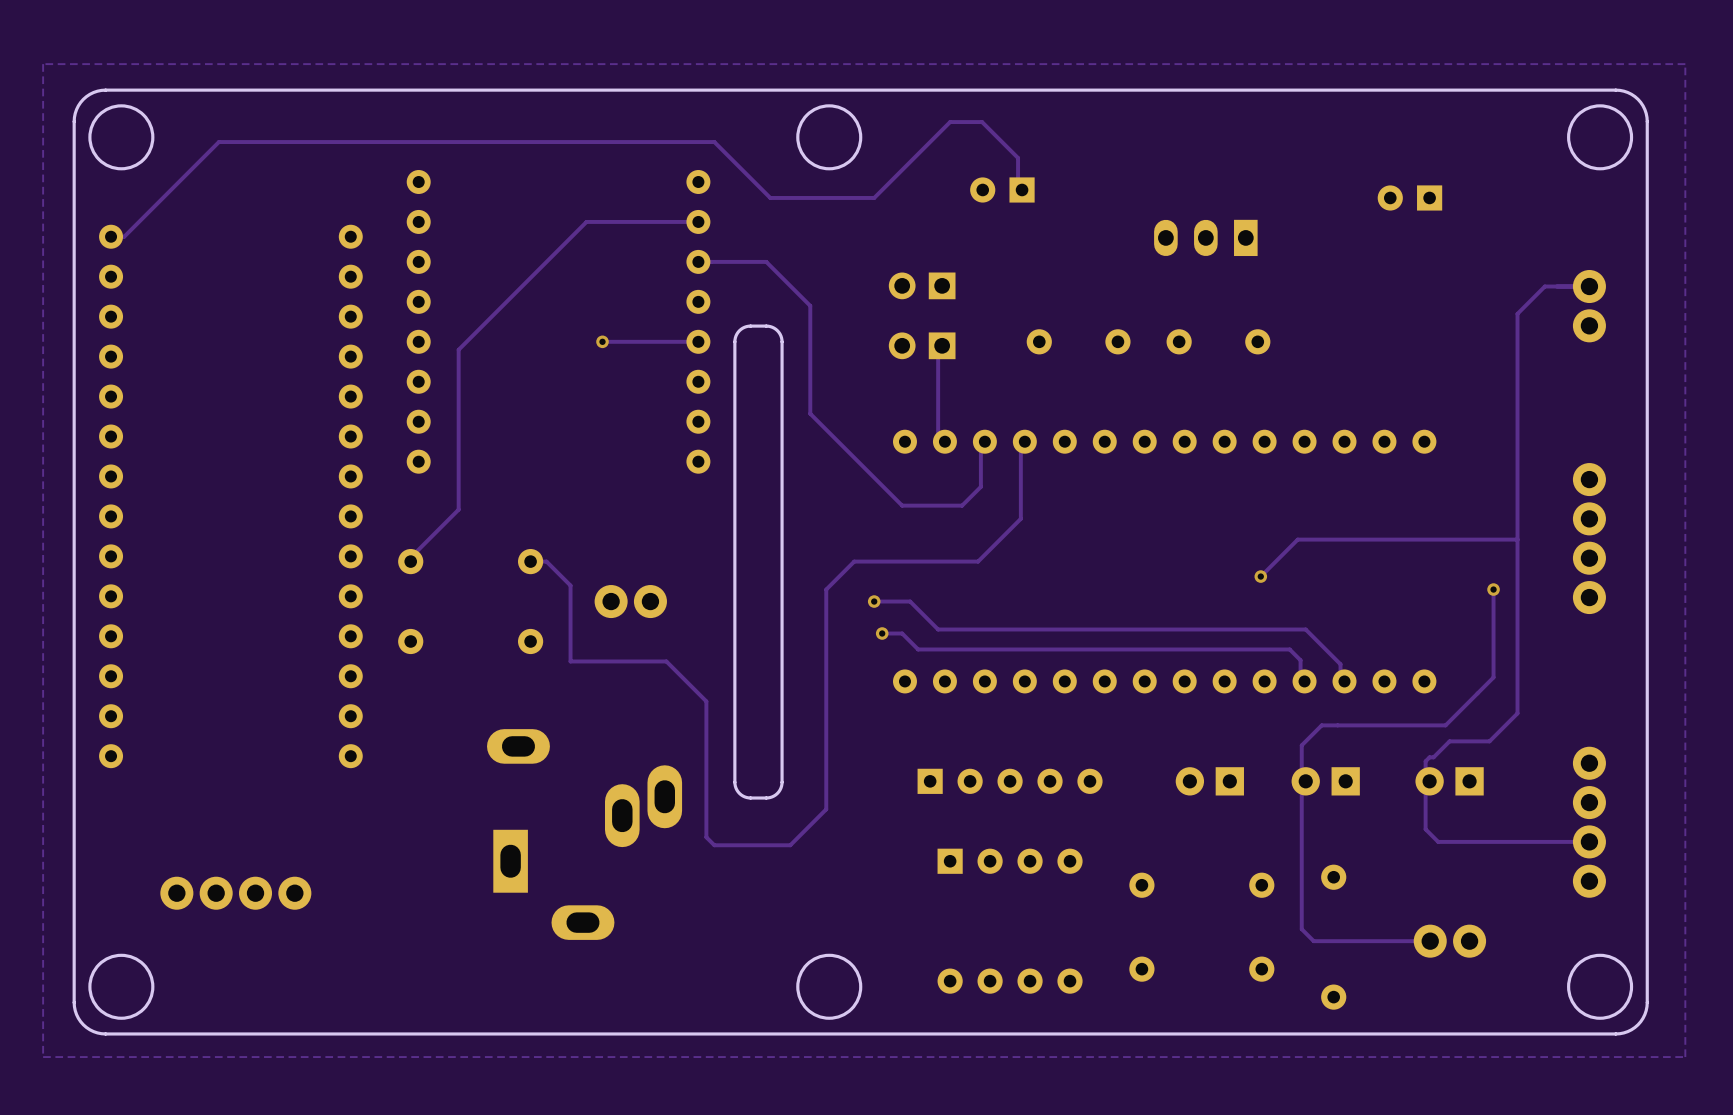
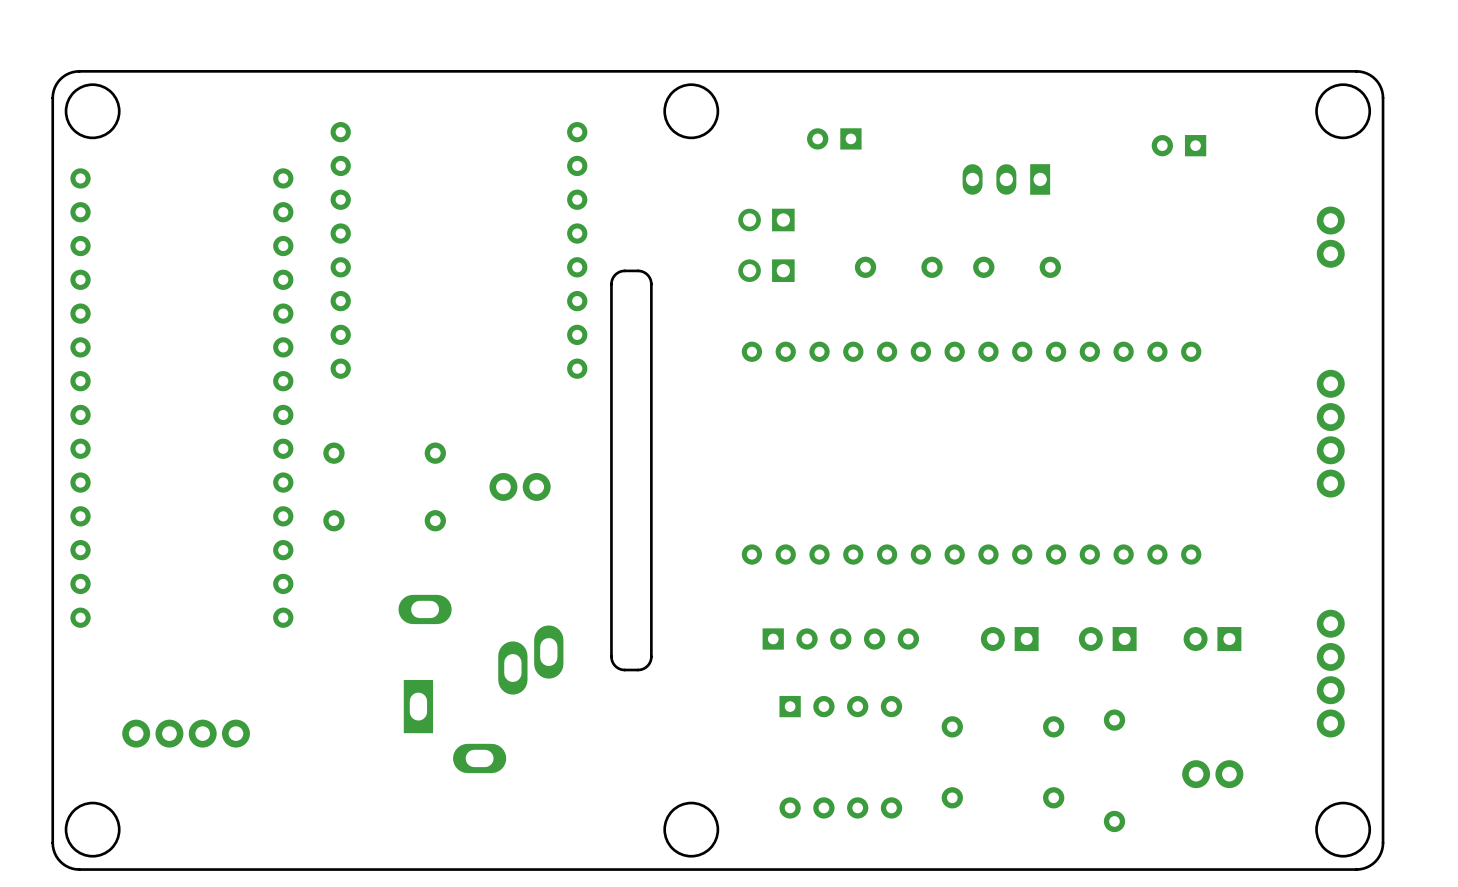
zone outline: (1685, 64) (1685, 1057) (43, 1057) (43, 64) (1685, 64) -> none
board edge: (1615, 90) (105, 90) (89, 94) (78, 105) (74, 121) (74, 1002) (78, 1018) (89, 1029) (105, 1033) (1615, 1033) (1631, 1029) (1643, 1018) (1647, 1002) (1647, 121) (1644, 109) (1638, 99) (1627, 92) (1615, 90) -> (1356, 71) (79, 71) (66, 74) (56, 84) (52, 97) (52, 842) (56, 856) (66, 865) (79, 869) (1356, 869) (1369, 865) (1379, 856) (1383, 842) (1383, 97) (1381, 87) (1375, 79) (1366, 73) (1356, 71)
round board edge position: (121, 137) -> (92, 111)
round board edge position: (829, 137) -> (691, 111)
round board edge position: (1600, 137) -> (1343, 111)
track: (1018, 189) (1018, 158) (982, 122) (950, 122) (874, 197) (770, 197) (714, 142) (218, 142) (124, 236) (107, 236) -> none
track: (694, 221) (586, 221) (458, 349) (458, 509) (406, 561) -> none
track: (694, 261) (766, 261) (810, 305) (810, 413) (902, 505) (962, 505) (980, 486) (980, 441) -> none
track: (1585, 286) (1544, 286) (1517, 313) (1517, 713) (1489, 741) (1449, 741) (1433, 757) (1429, 757) (1425, 761) (1425, 829) (1438, 841) (1585, 841) -> none
board edge: (766, 326) (742, 328) (736, 333) (734, 341) (734, 782) (739, 793) (750, 798) (774, 795) (779, 790) (782, 782) (782, 341) (777, 330) (766, 326) -> (638, 270) (618, 272) (613, 277) (611, 284) (611, 656) (615, 666) (624, 670) (644, 668) (649, 663) (651, 656) (651, 284) (647, 274) (638, 270)
via: (602, 341) -> none
track: (694, 341) (602, 341) -> none
track: (938, 345) (938, 438) (940, 441) -> none
track: (1020, 441) (1020, 518) (978, 561) (854, 561) (826, 589) (826, 809) (790, 845) (714, 845) (706, 837) (706, 701) (666, 661) (570, 661) (570, 585) (546, 561) (526, 561) -> none
track: (1517, 539) (1297, 539) (1259, 577) -> none
via: (1260, 576) -> none
track: (1493, 589) (1493, 677) (1445, 725) (1321, 725) (1301, 745) (1301, 929) (1313, 941) (1426, 941) -> none
via: (1493, 589) -> none
track: (874, 601) (910, 601) (938, 629) (1305, 629) (1340, 664) (1340, 681) -> none
via: (874, 601) -> none
track: (882, 633) (902, 633) (918, 649) (1289, 649) (1300, 660) (1300, 681) -> none
via: (882, 633) -> none
round board edge position: (121, 986) -> (92, 829)
round board edge position: (829, 986) -> (691, 829)
round board edge position: (1600, 986) -> (1343, 829)

